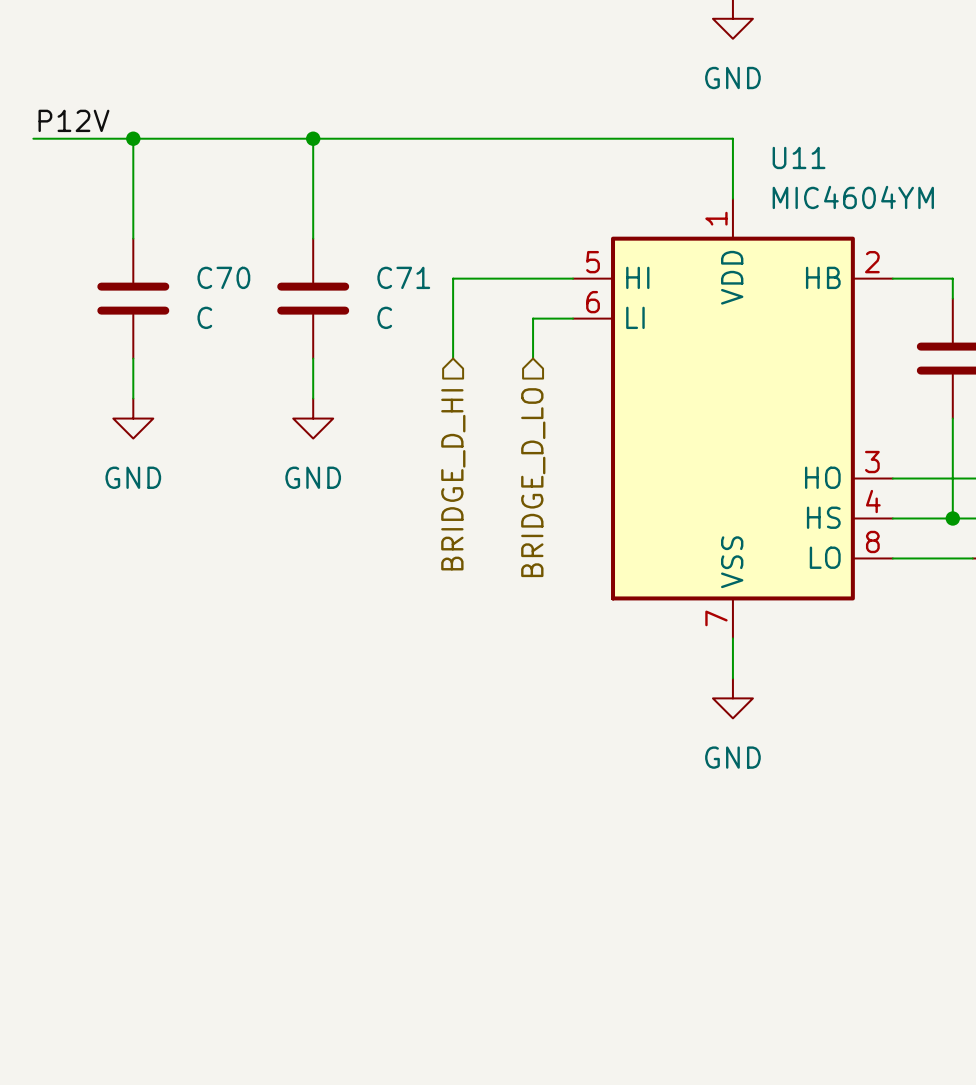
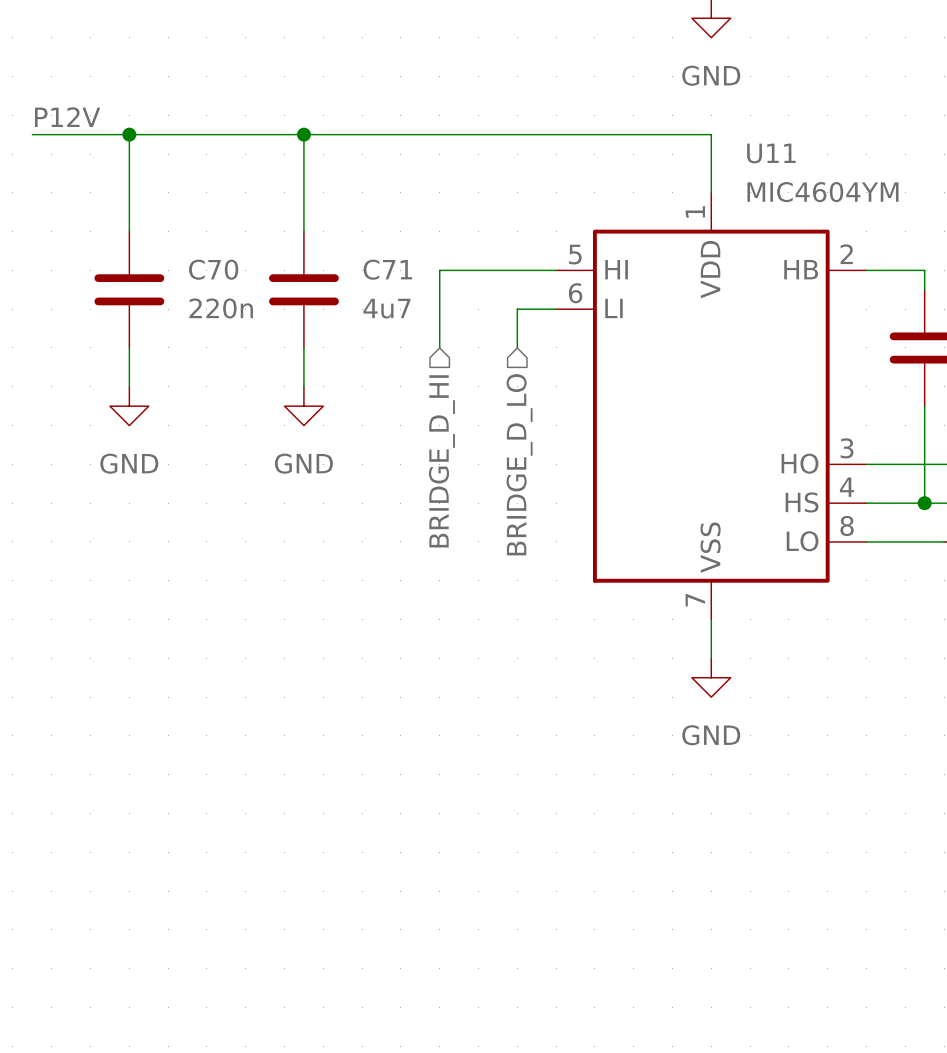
C70 value: C (204, 317) -> 220n (221, 308)
C71 value: C (384, 317) -> 4u7 (387, 308)

